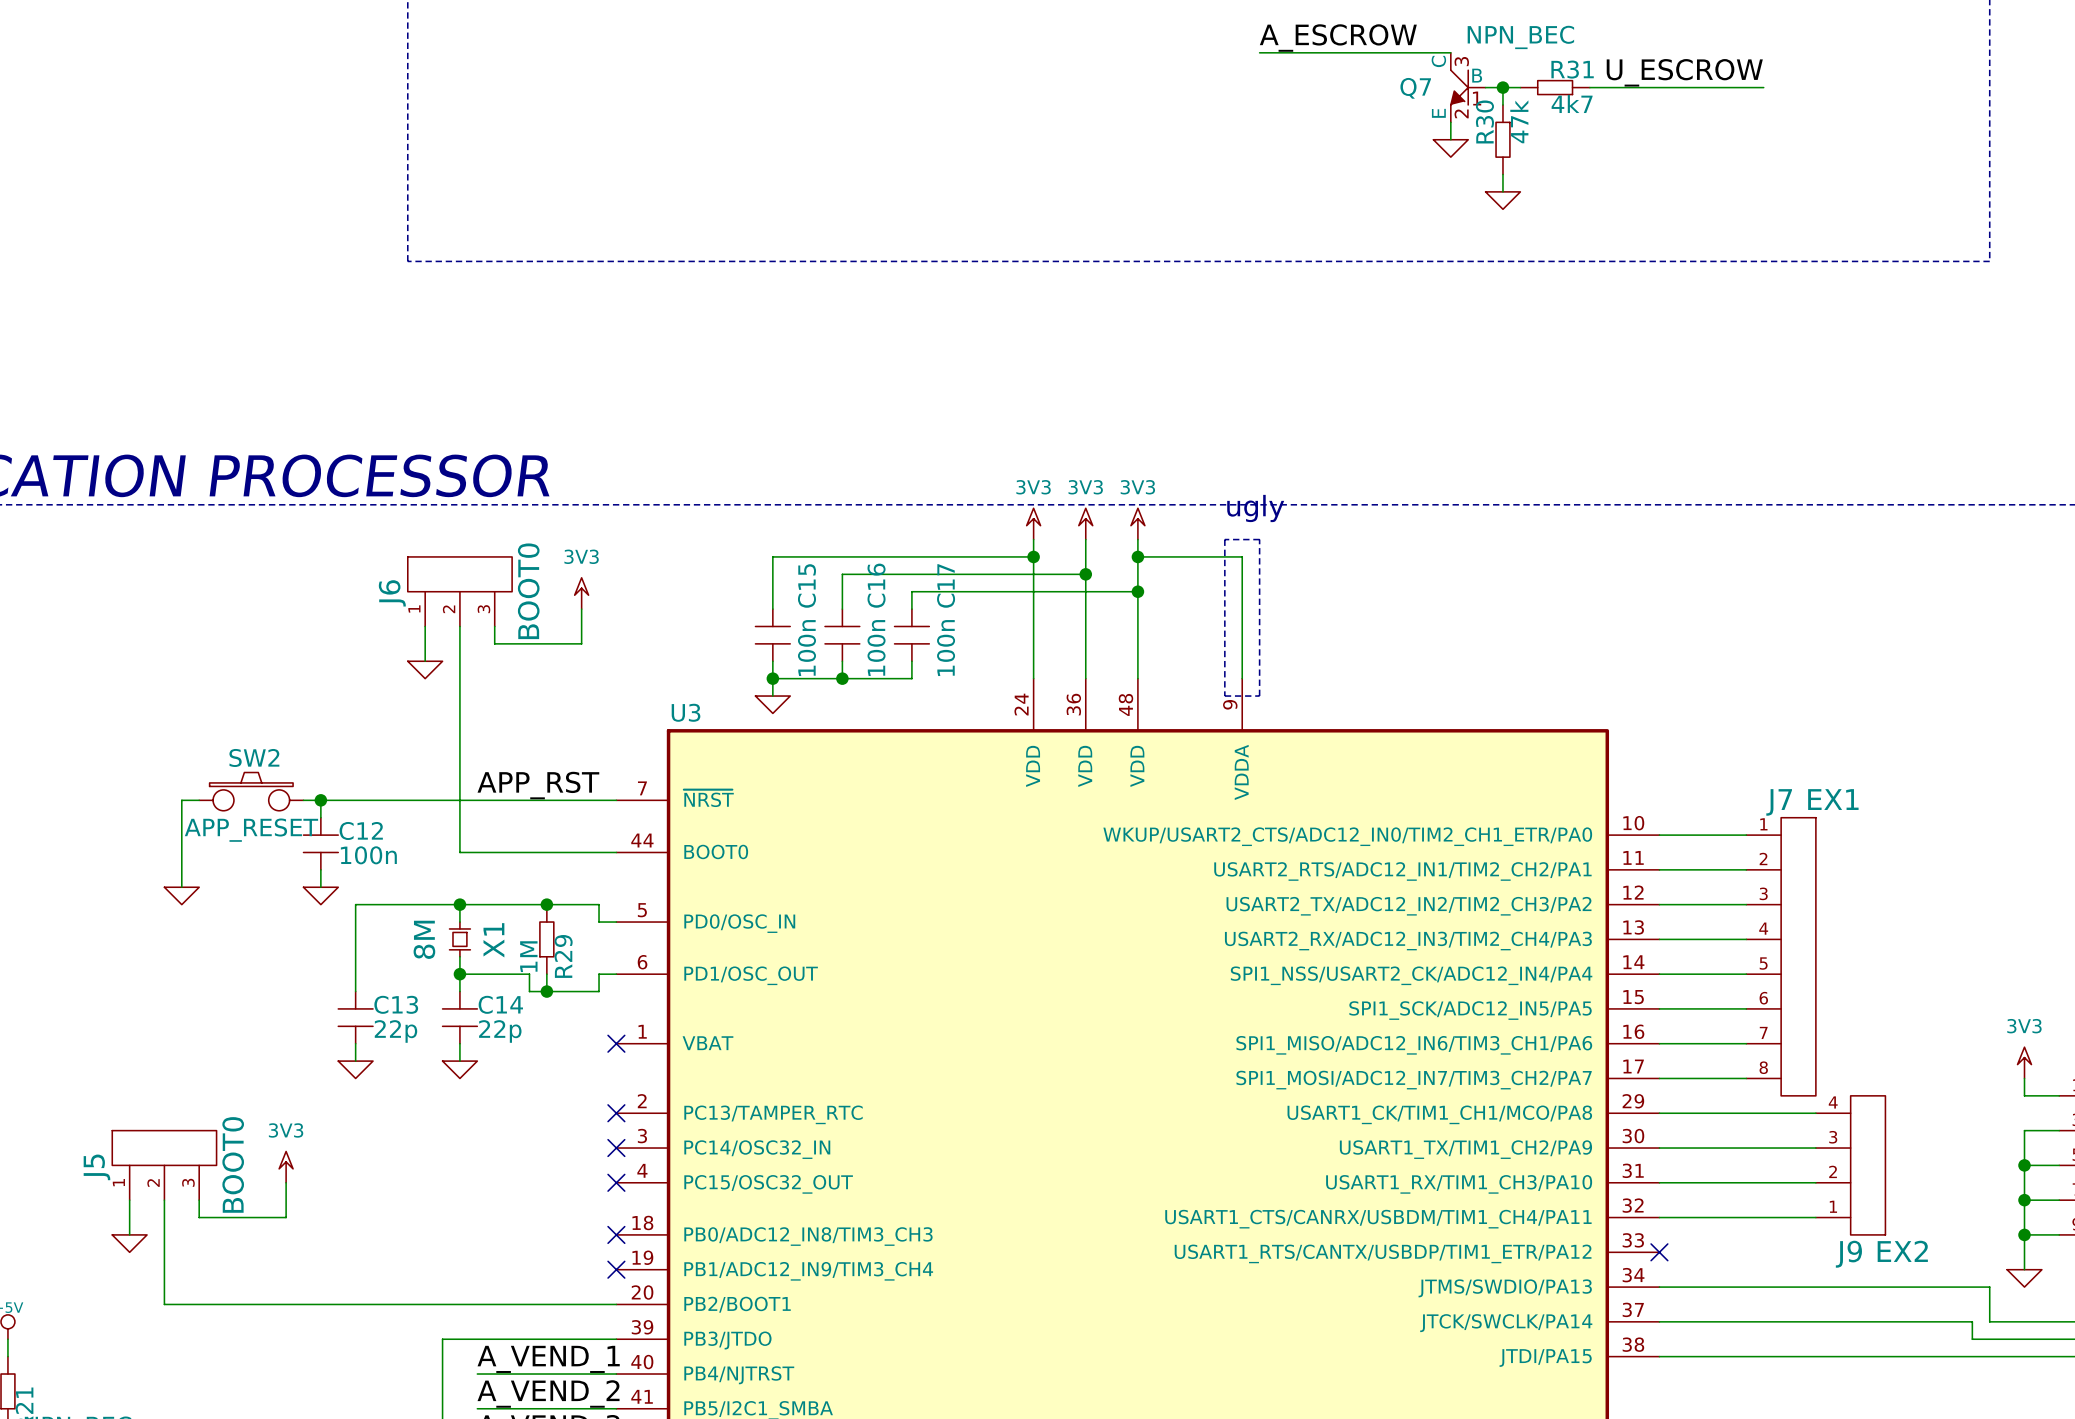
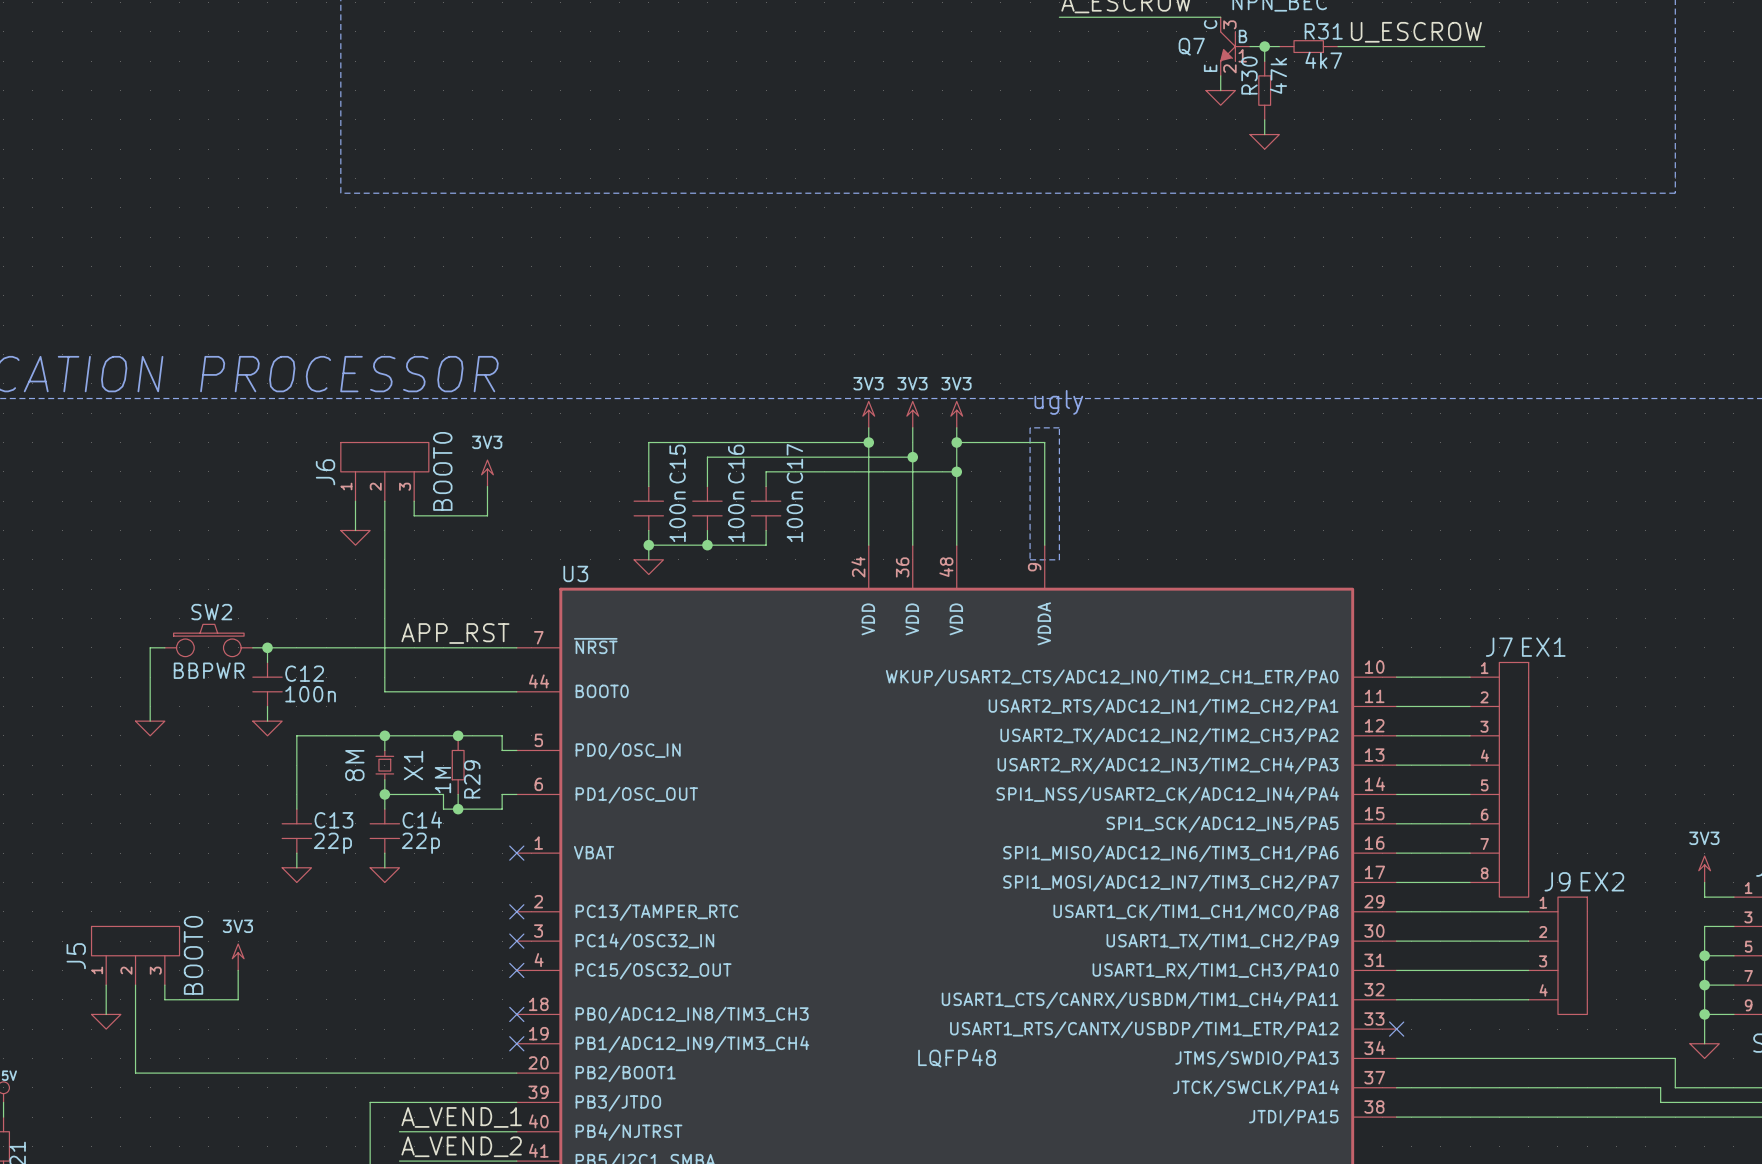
SW2 value: APP_RESET (251, 830) -> BBPWR (209, 670)
J9 flip: as is (1868, 1165) -> up-down (1572, 955)
U3 text: none -> LQFP48 (957, 1058)

